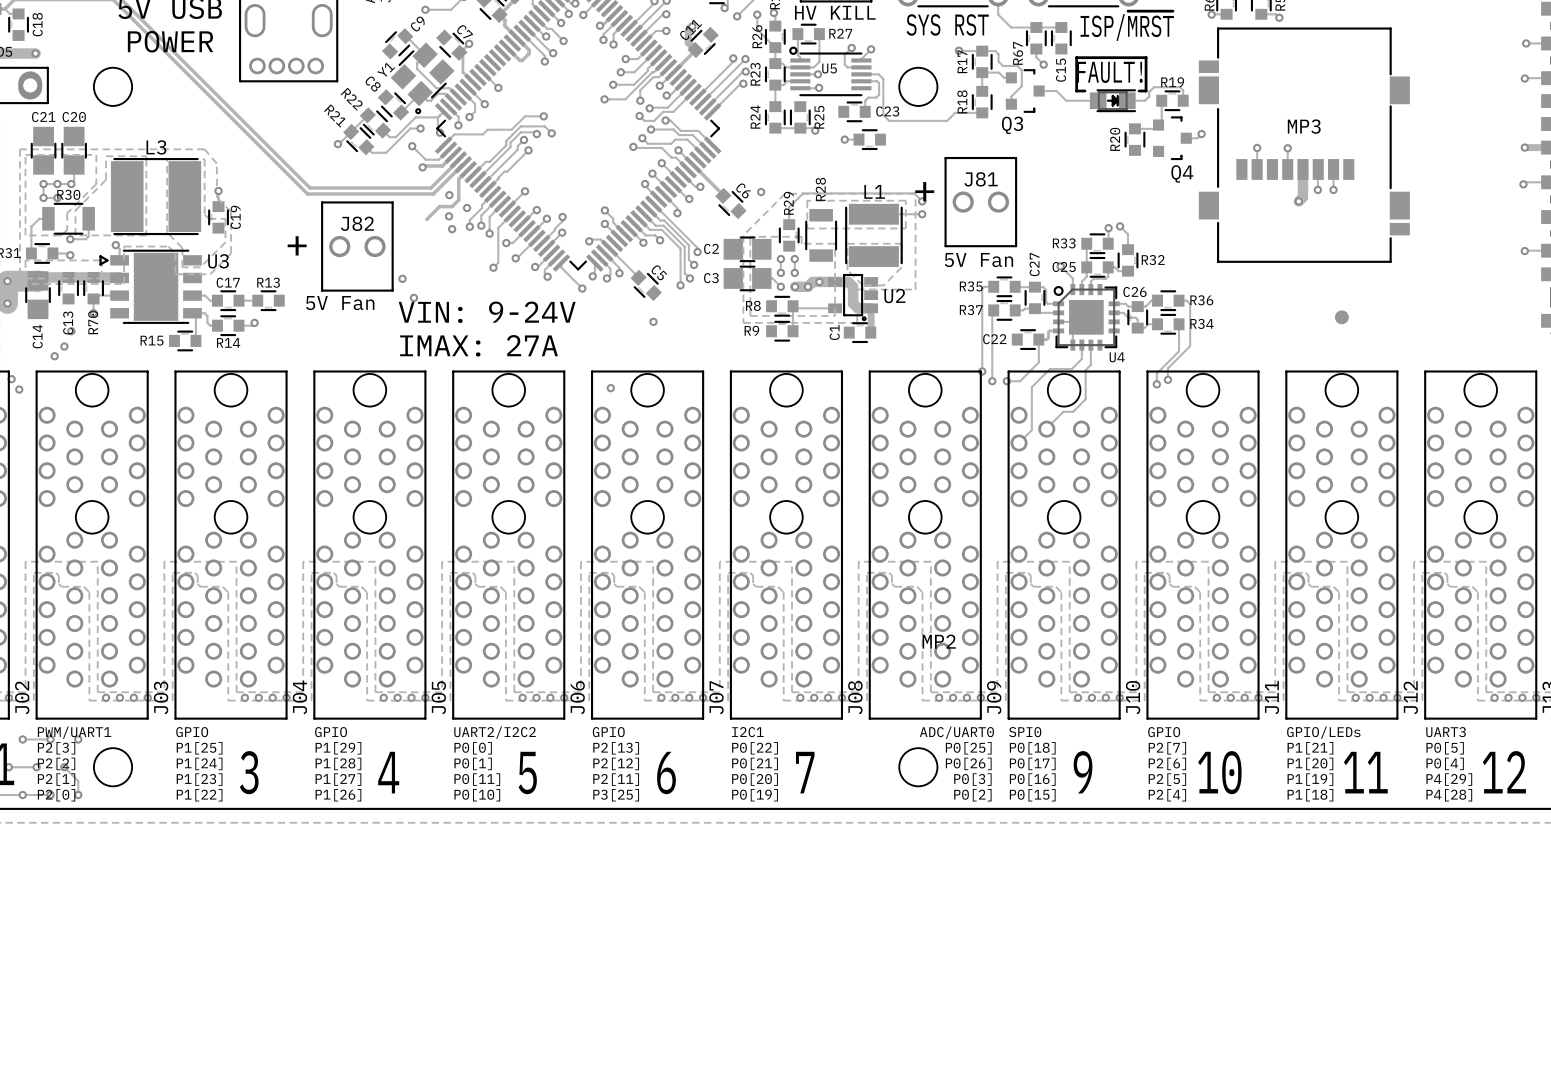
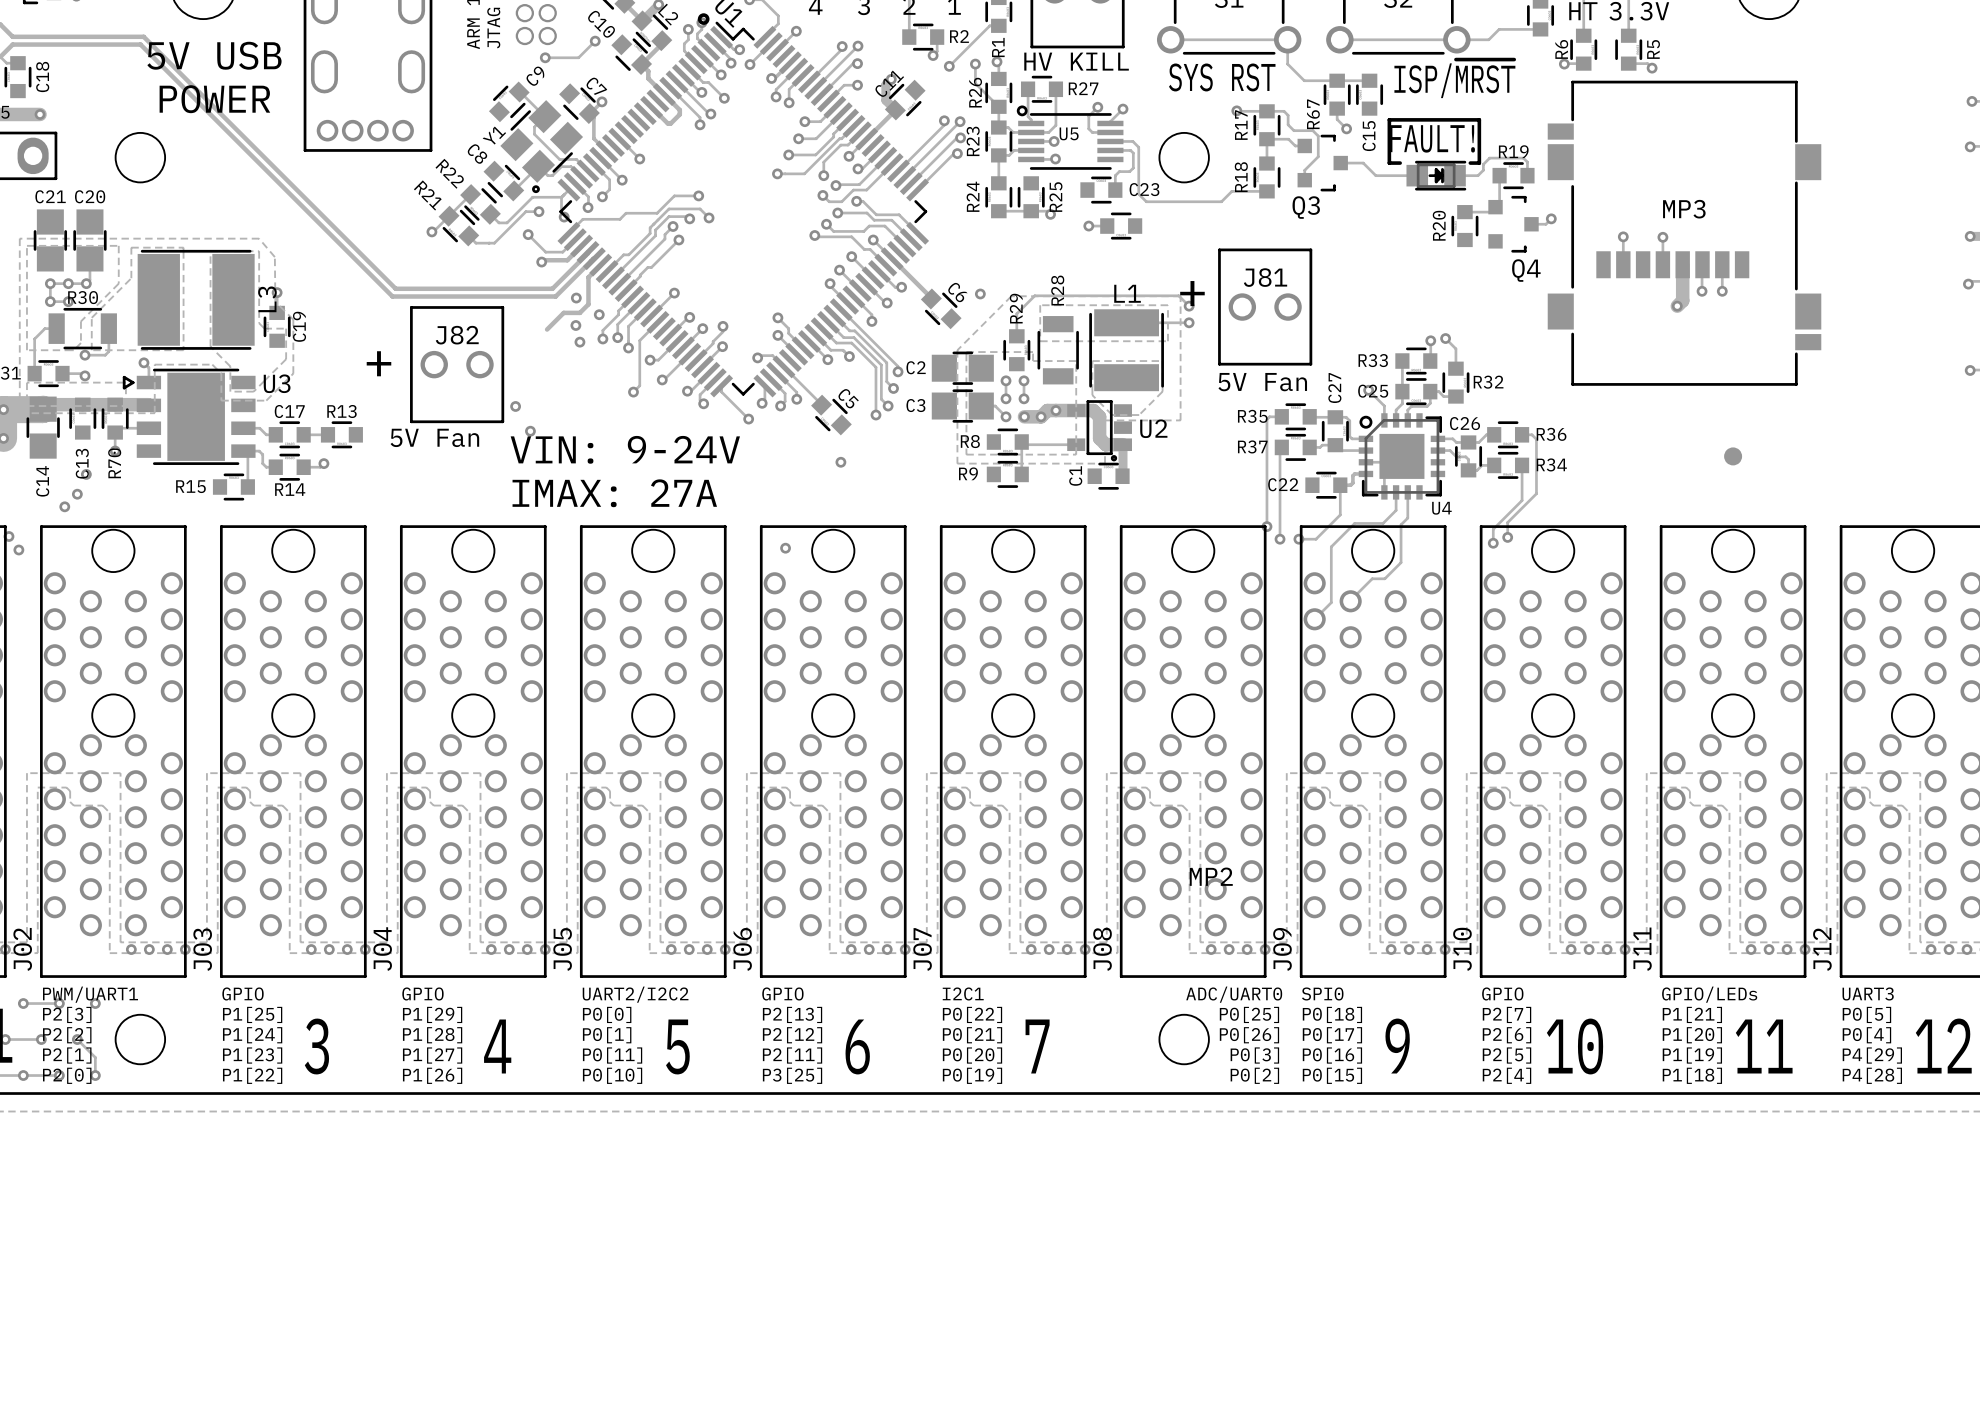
L3 name rotation: 0° (156, 147) -> 90° counterclockwise (267, 299)
L3 name position: L3 (156, 147) -> L3 (267, 299)

